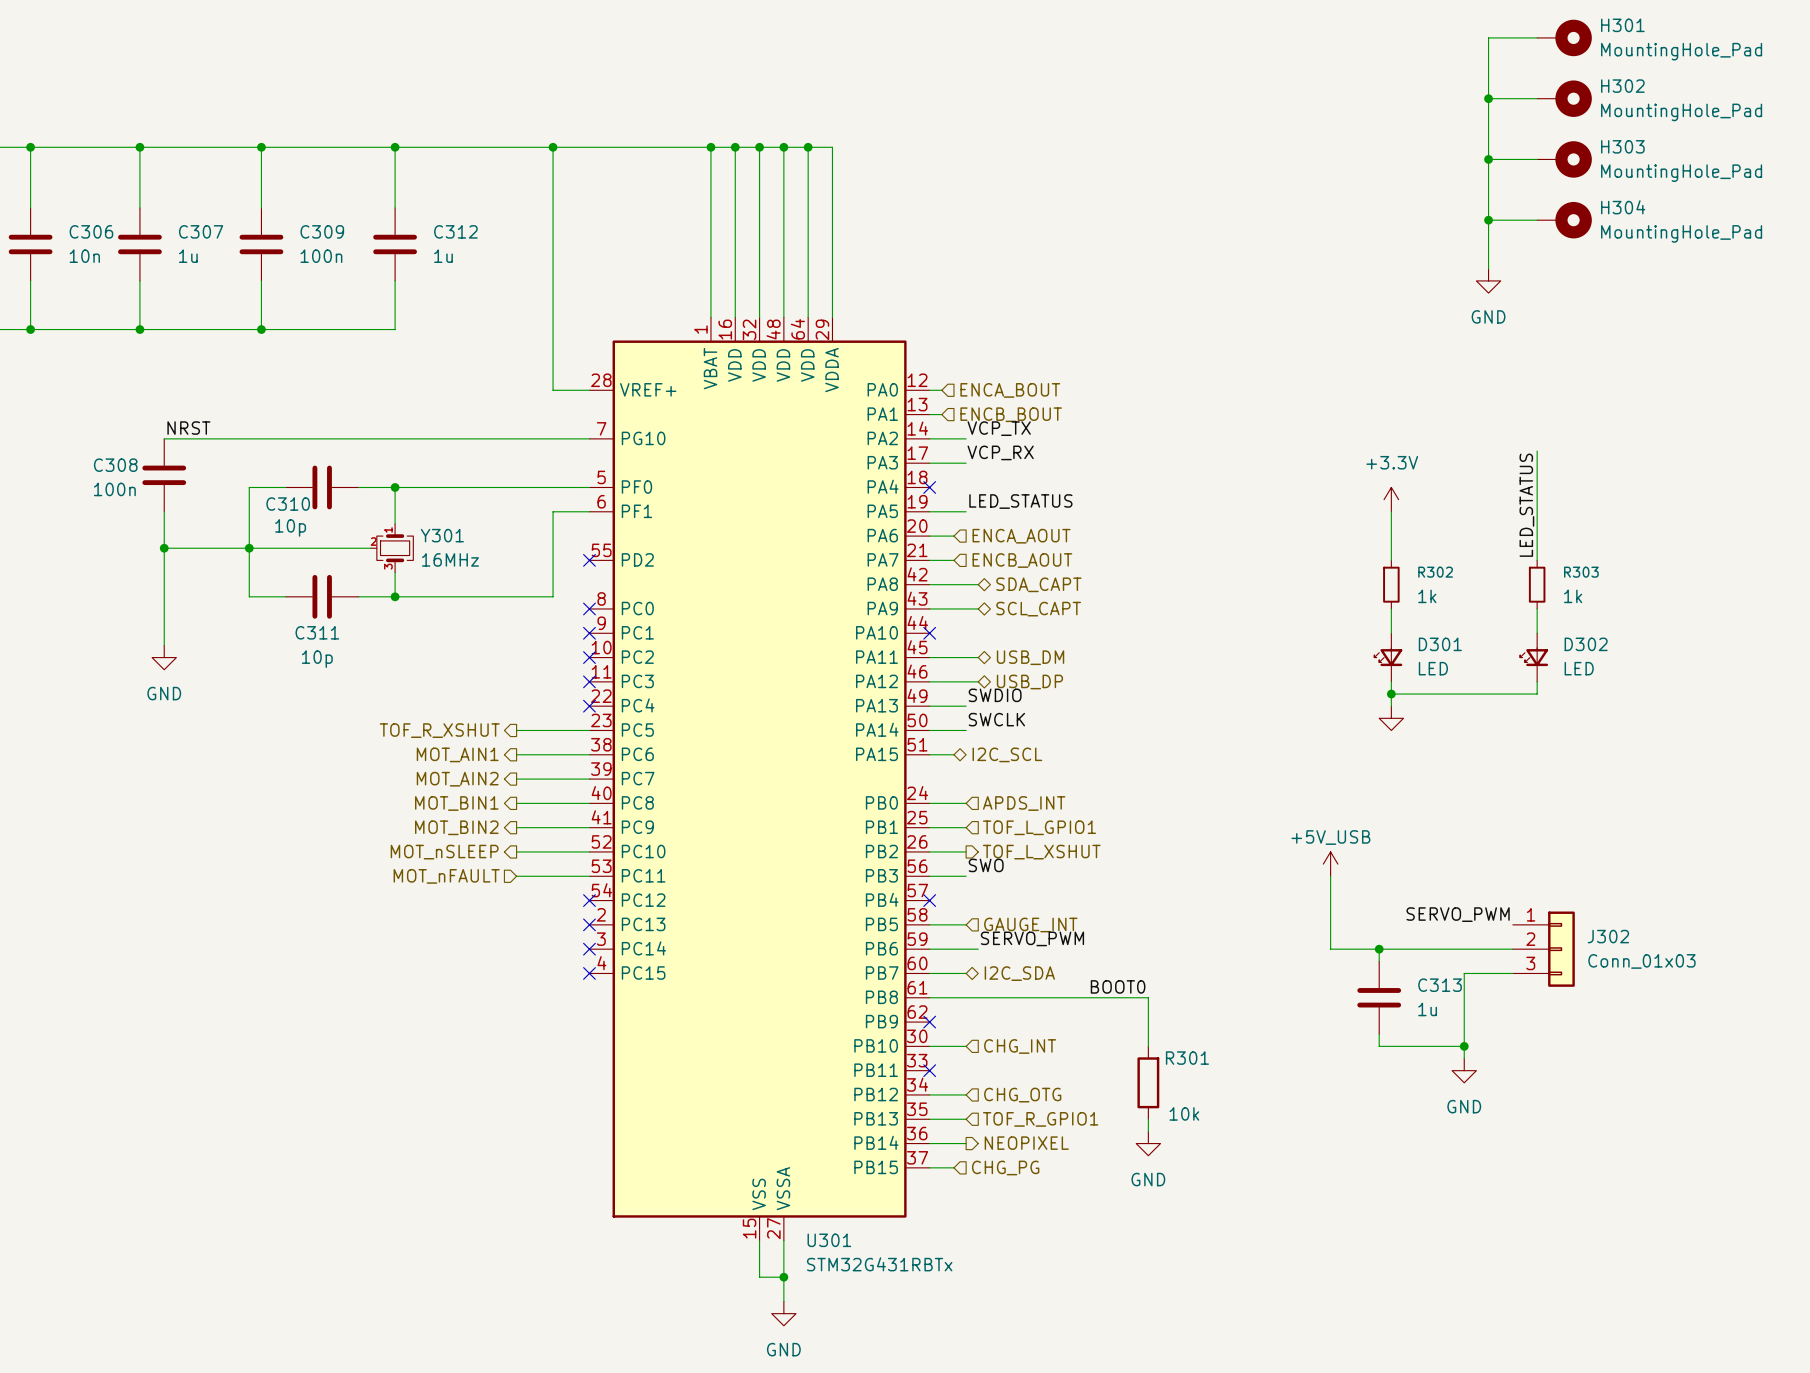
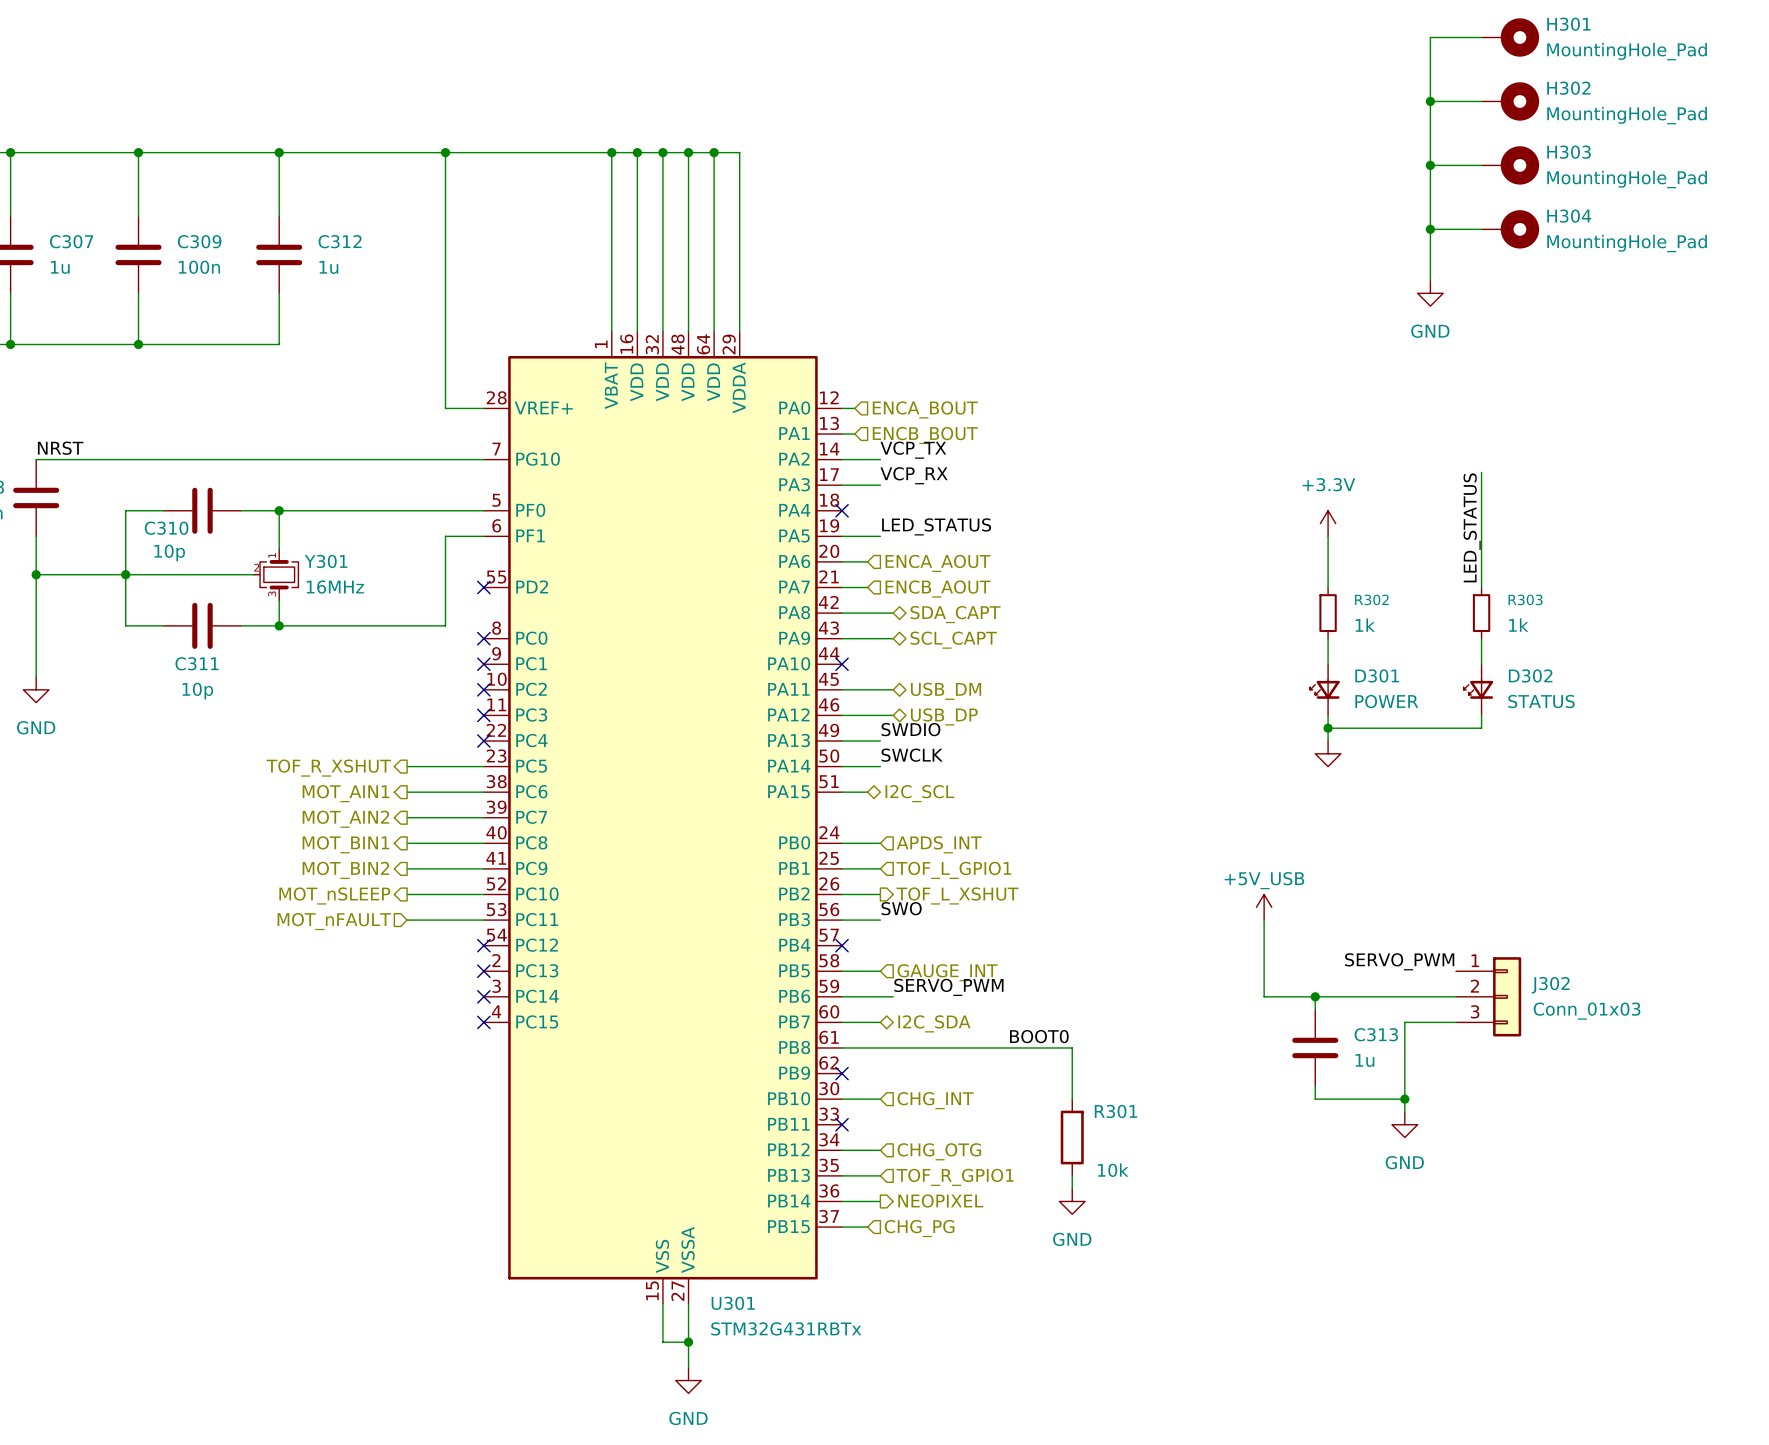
D301 value: LED (1433, 668) -> POWER (1386, 701)
D302 value: LED (1579, 668) -> STATUS (1541, 701)

